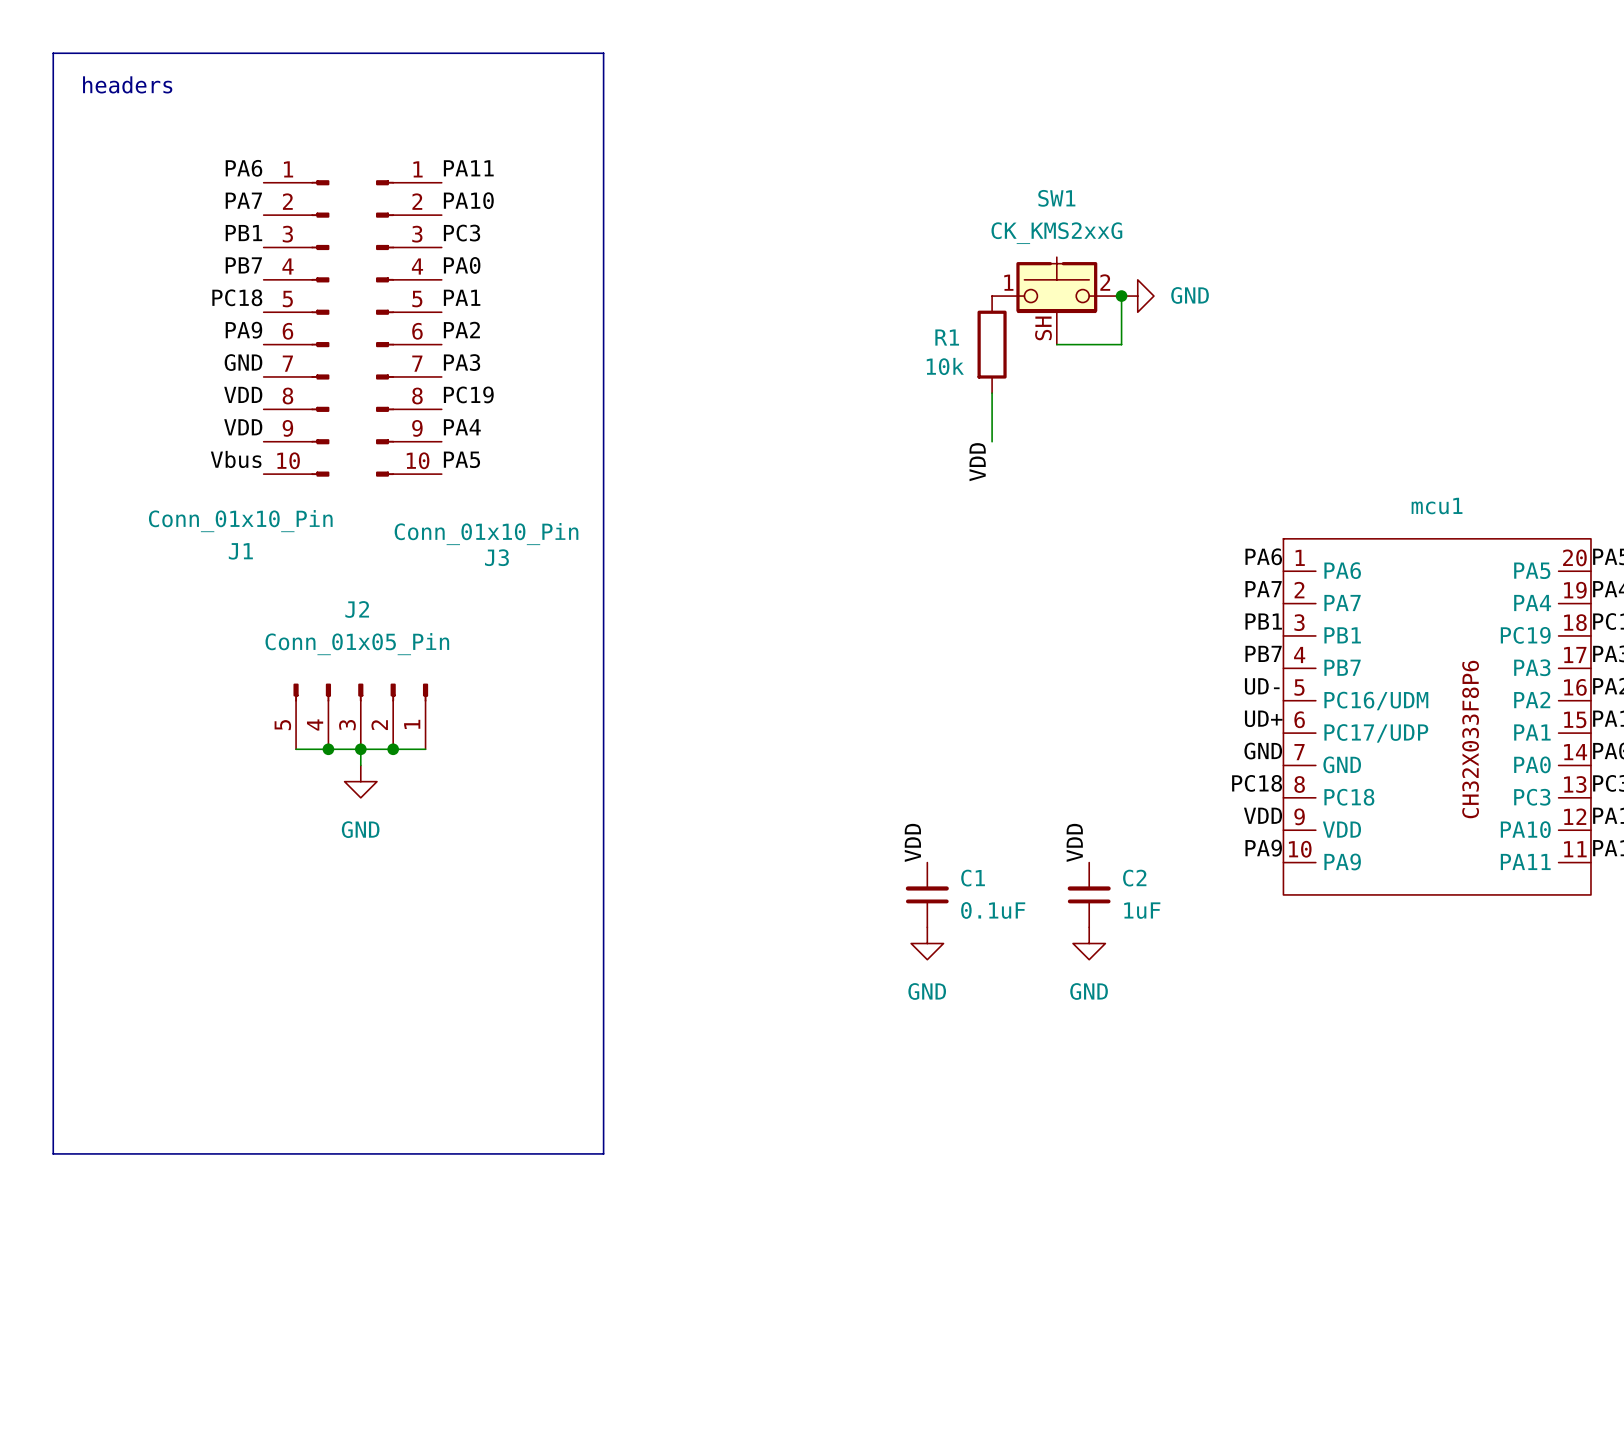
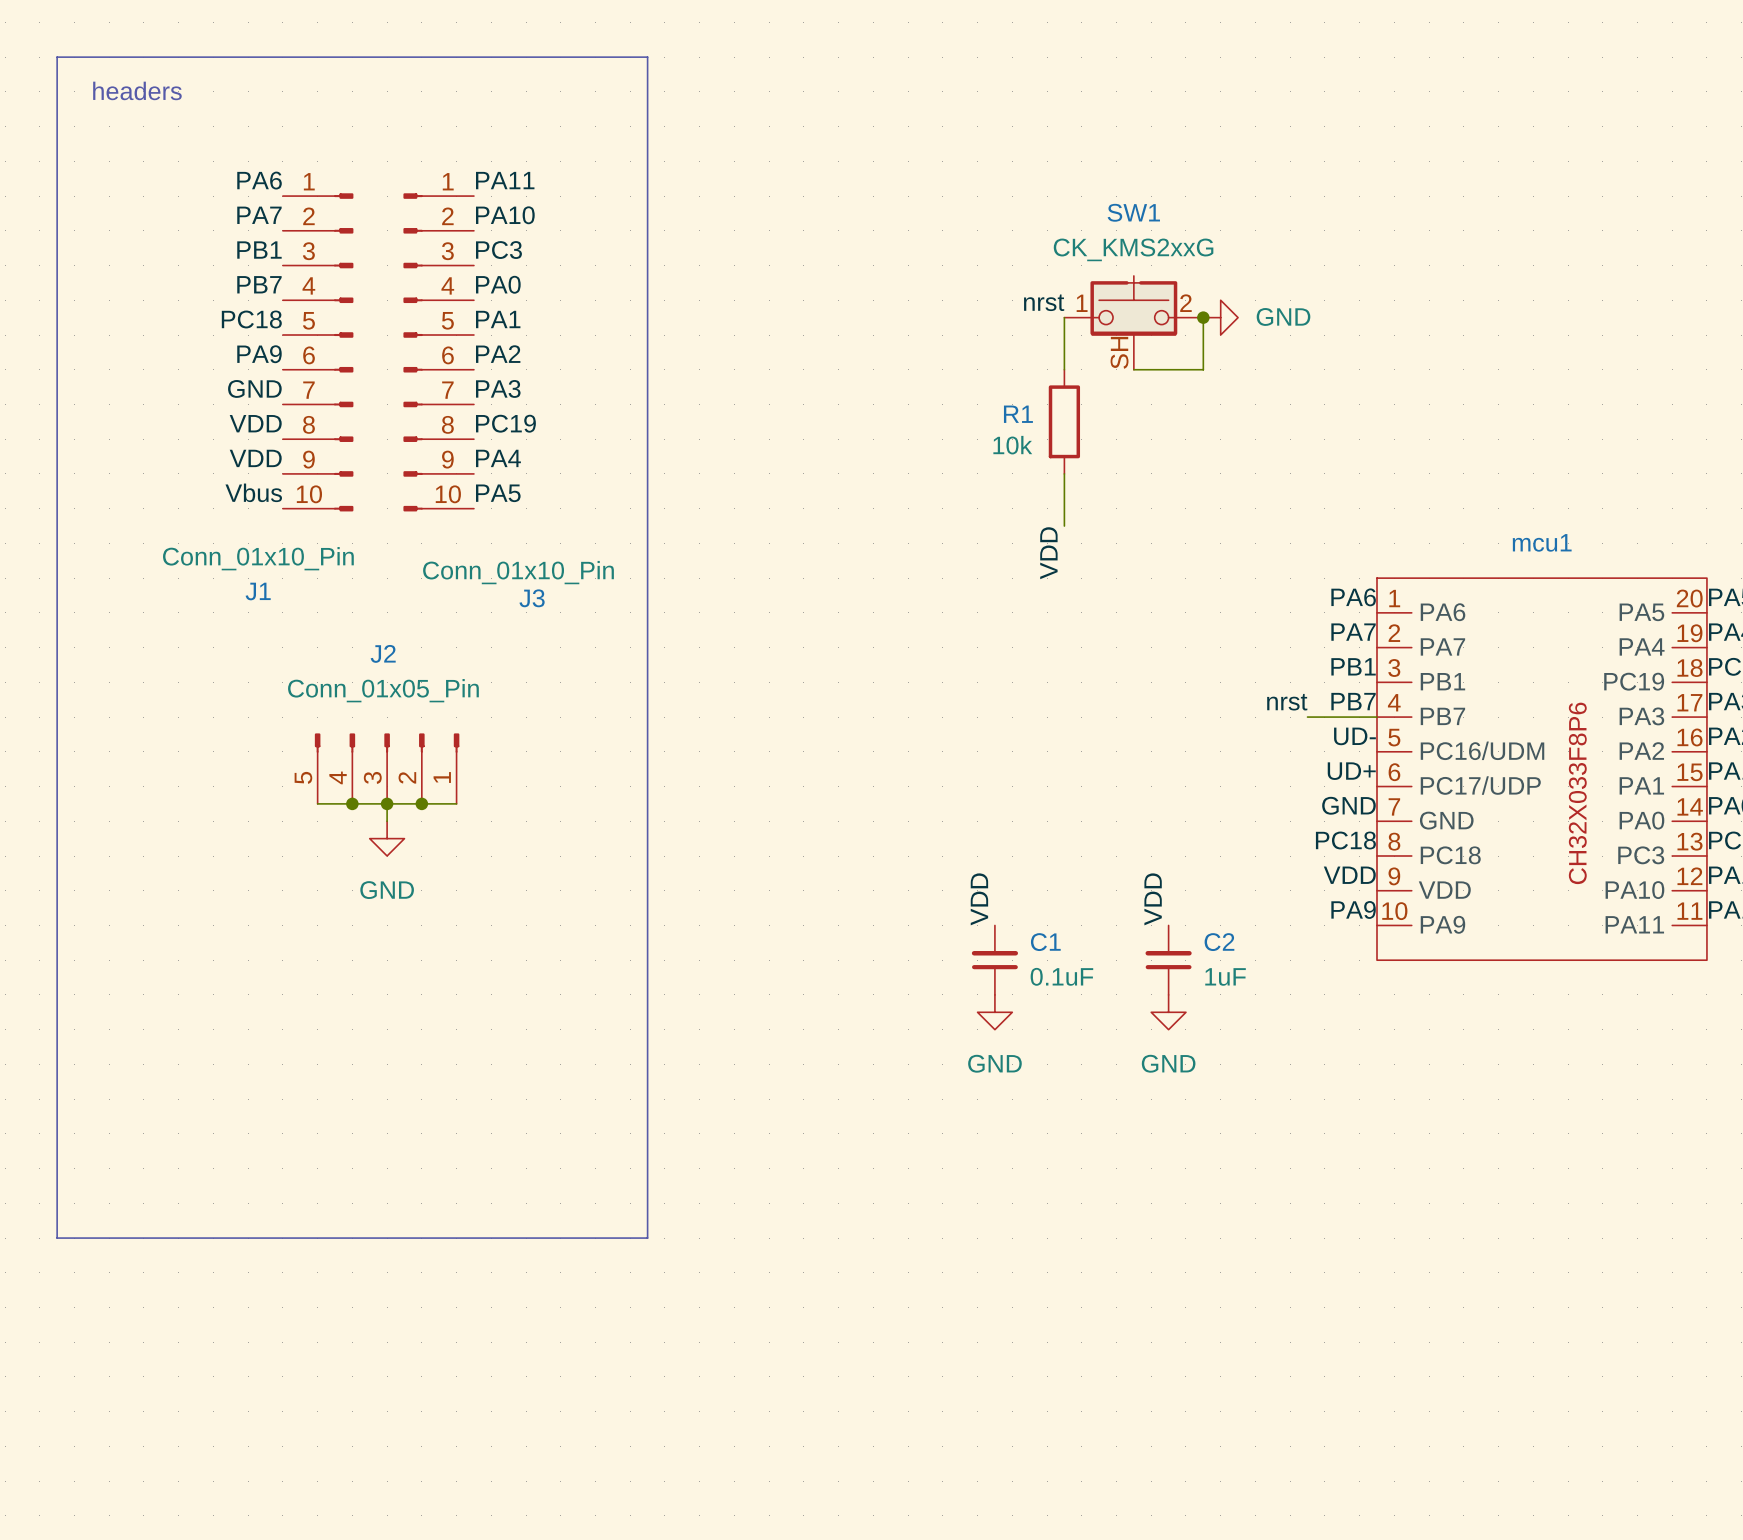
label: none -> nrst (1044, 302)
wire: none -> (1064, 317) (1064, 369)
R1 position: (992, 344) -> (1064, 421)
wire: (992, 393) (992, 441) -> (1064, 526) (1064, 473)
label position: VDD (977, 462) -> VDD (1048, 553)
label: none -> nrst (1287, 702)
wire: none -> (1307, 717) (1376, 717)

